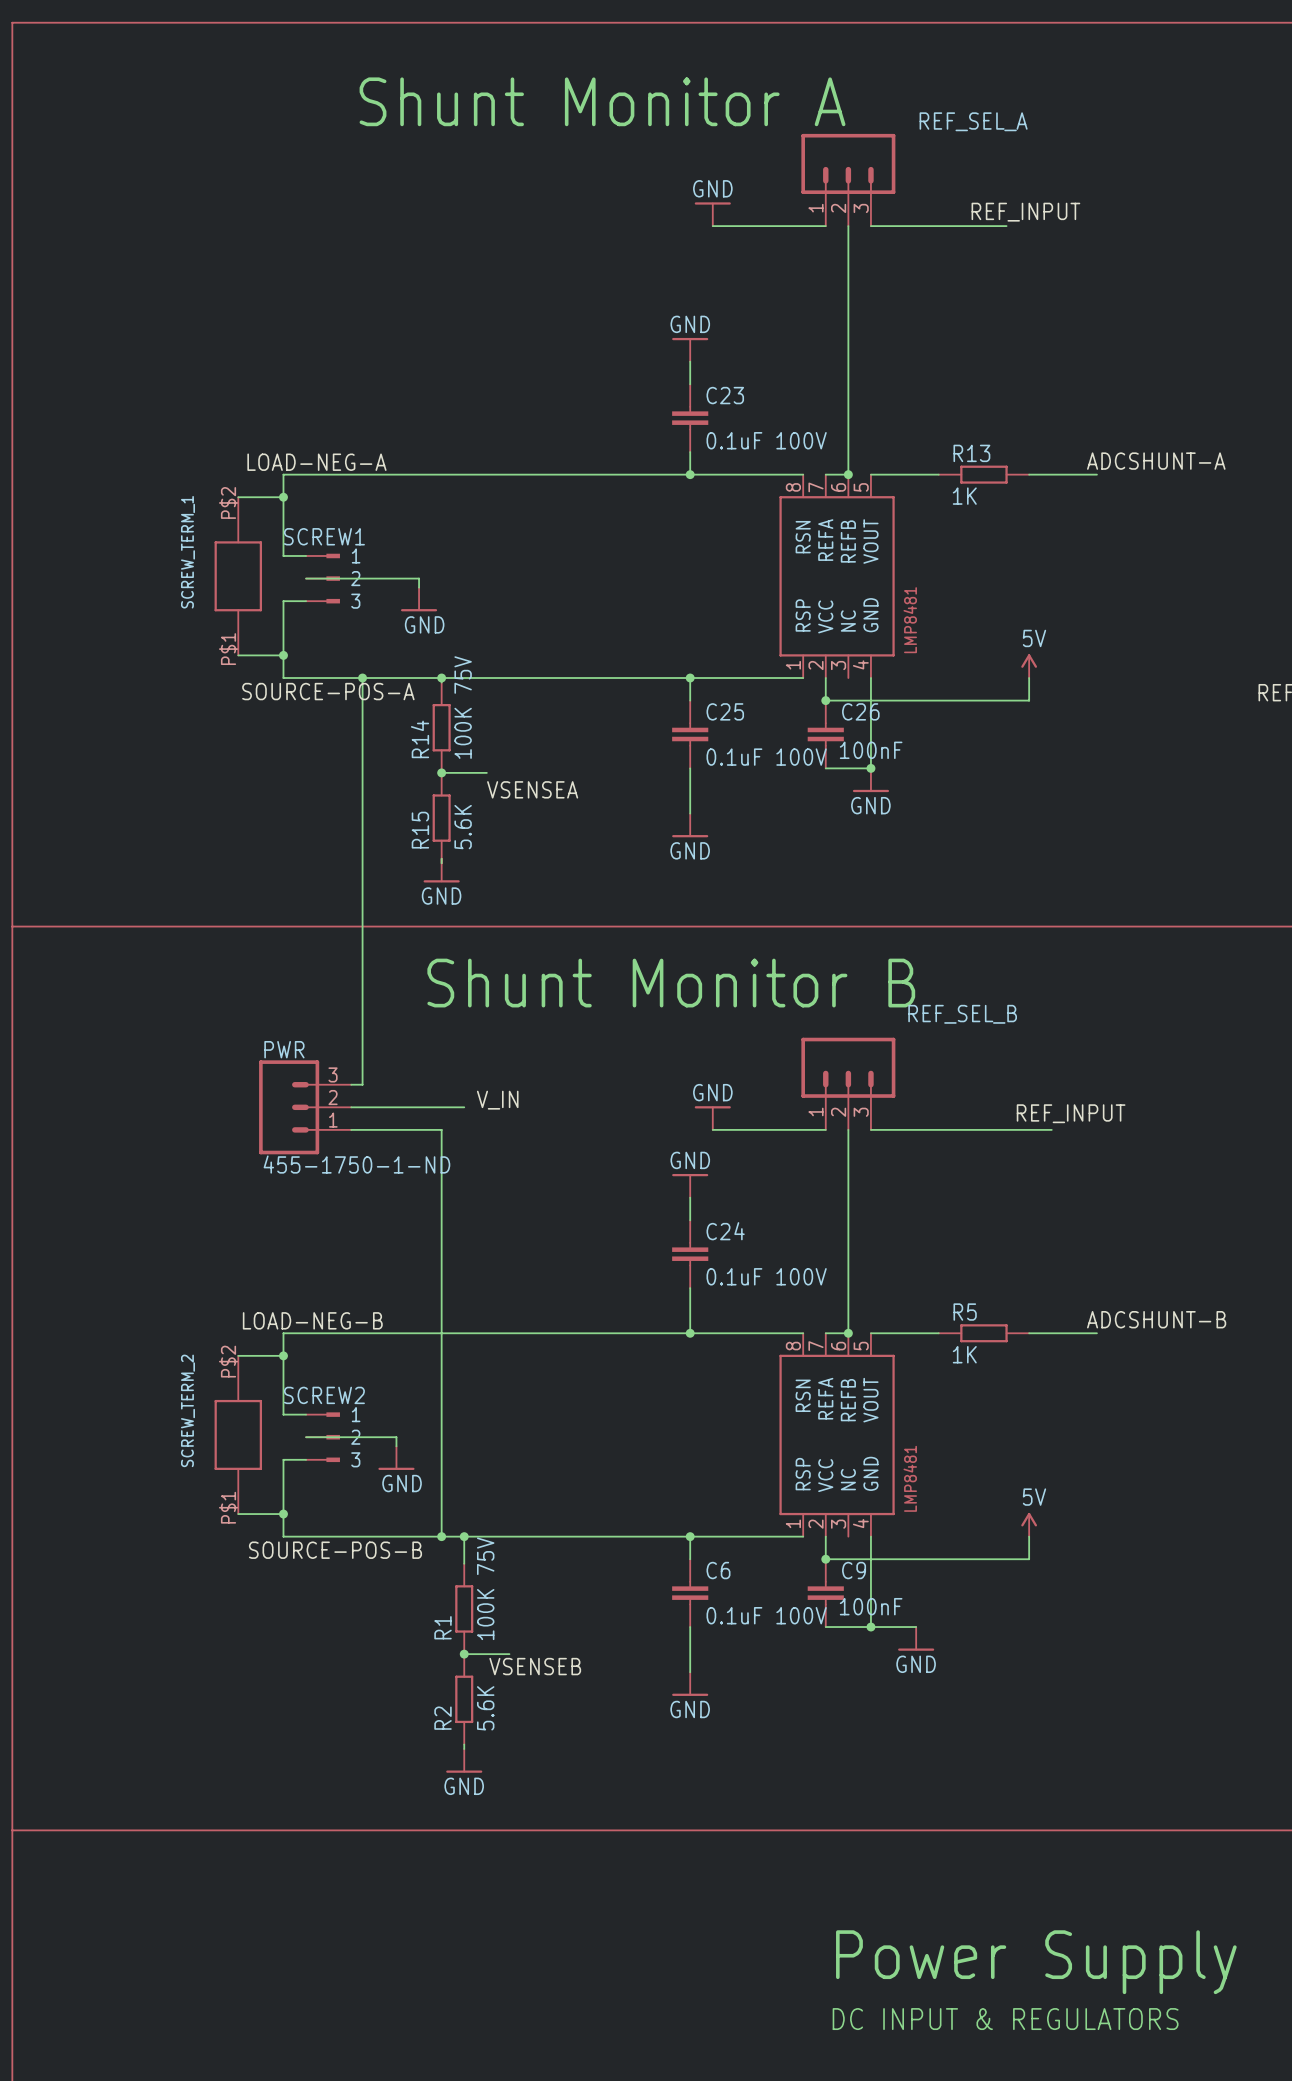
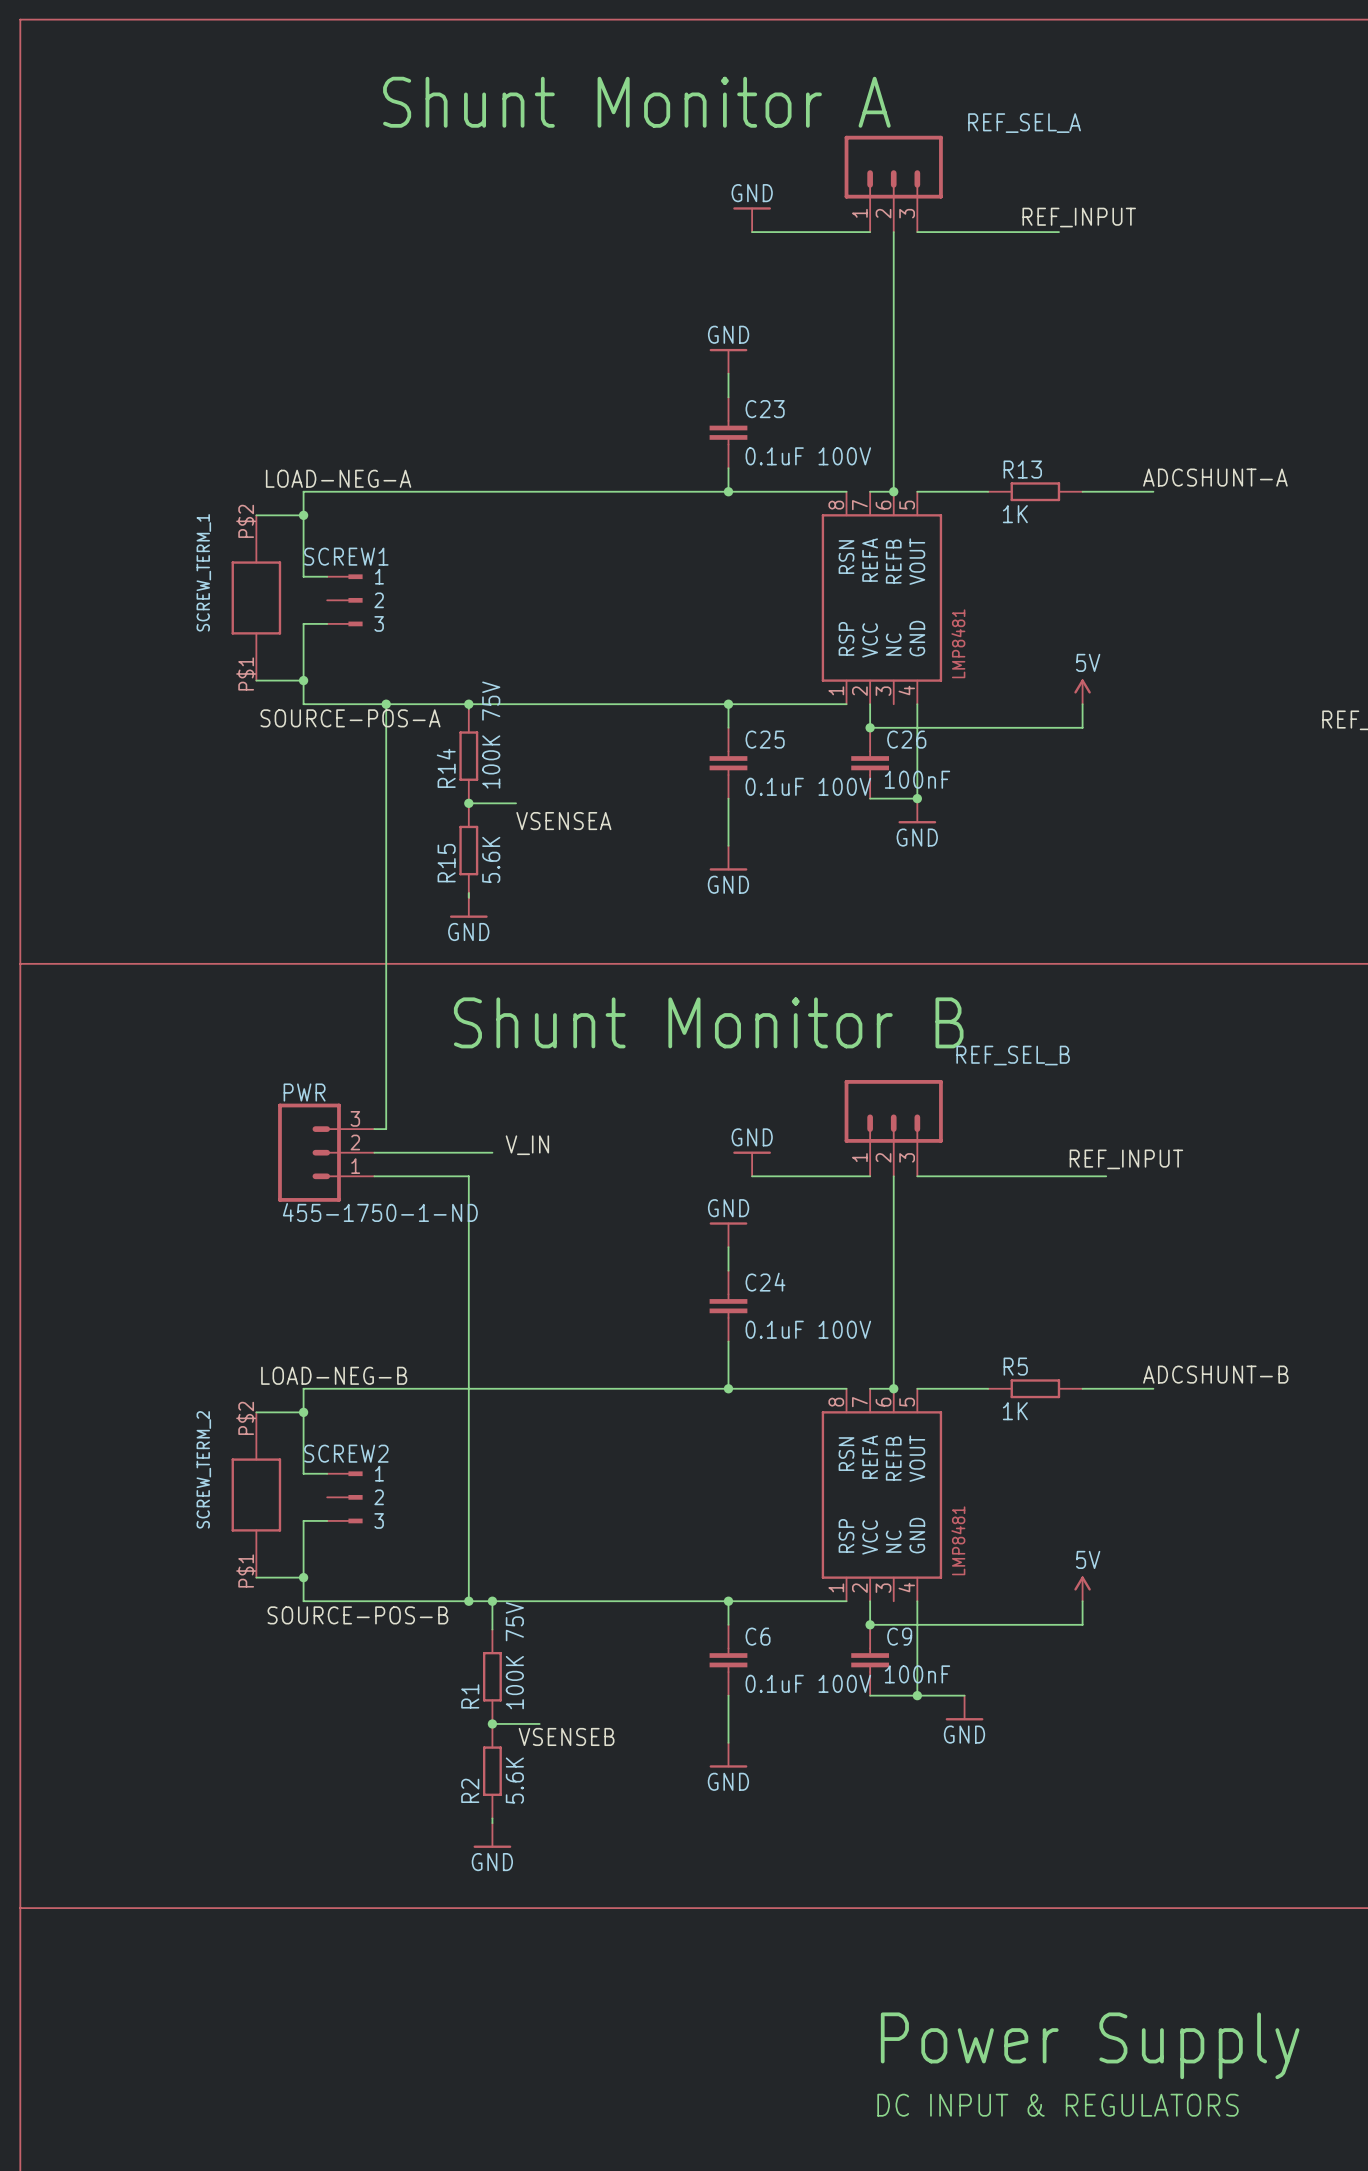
wire: (306, 578) (419, 578) (419, 587) -> none
power symbol: GND (419, 599) -> none
wire: (306, 1437) (396, 1437) (396, 1446) -> none
power symbol: GND (396, 1458) -> none

